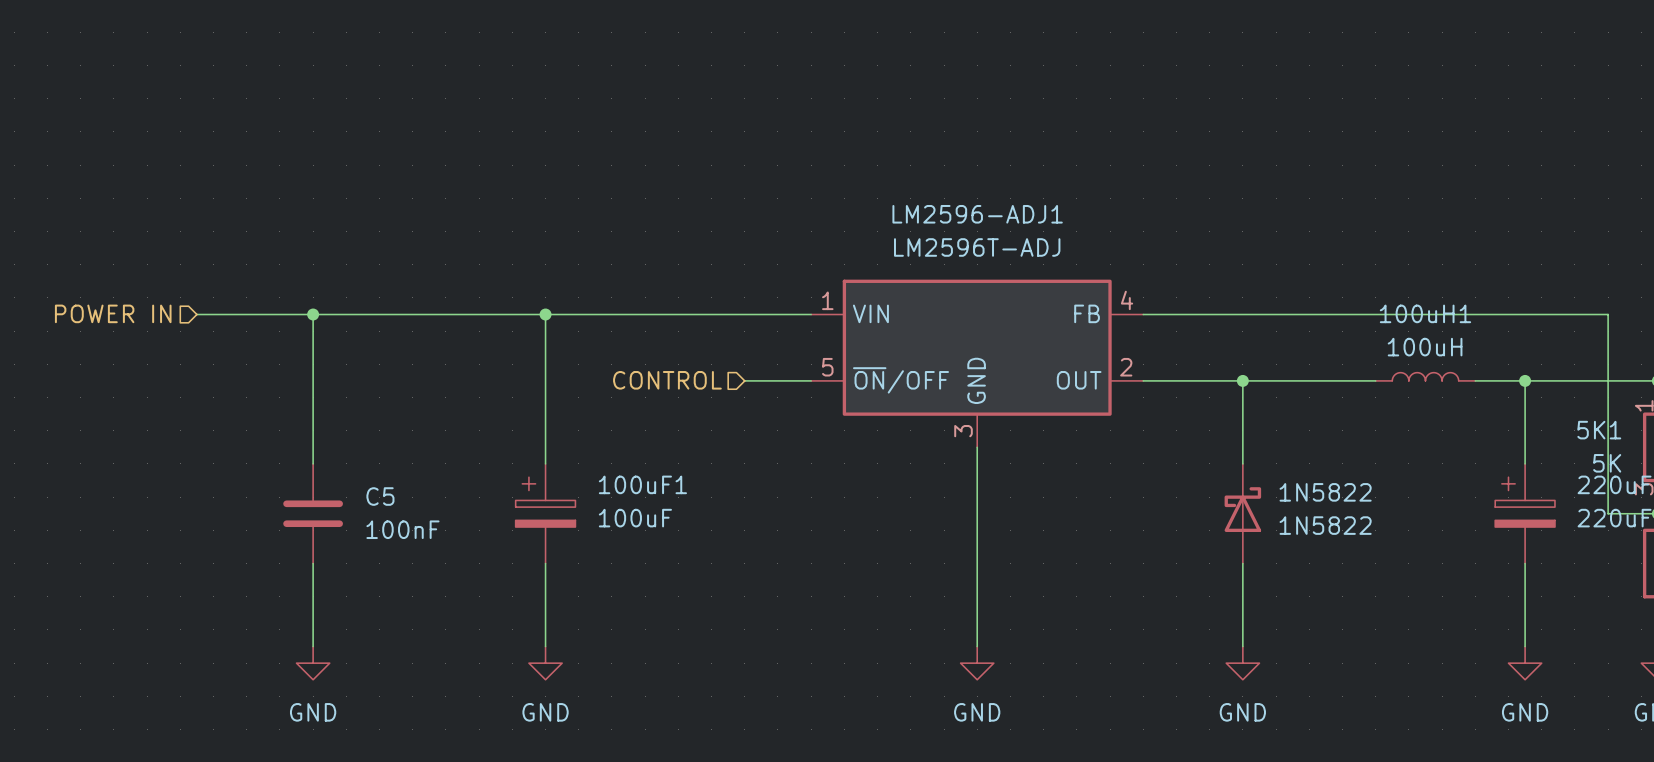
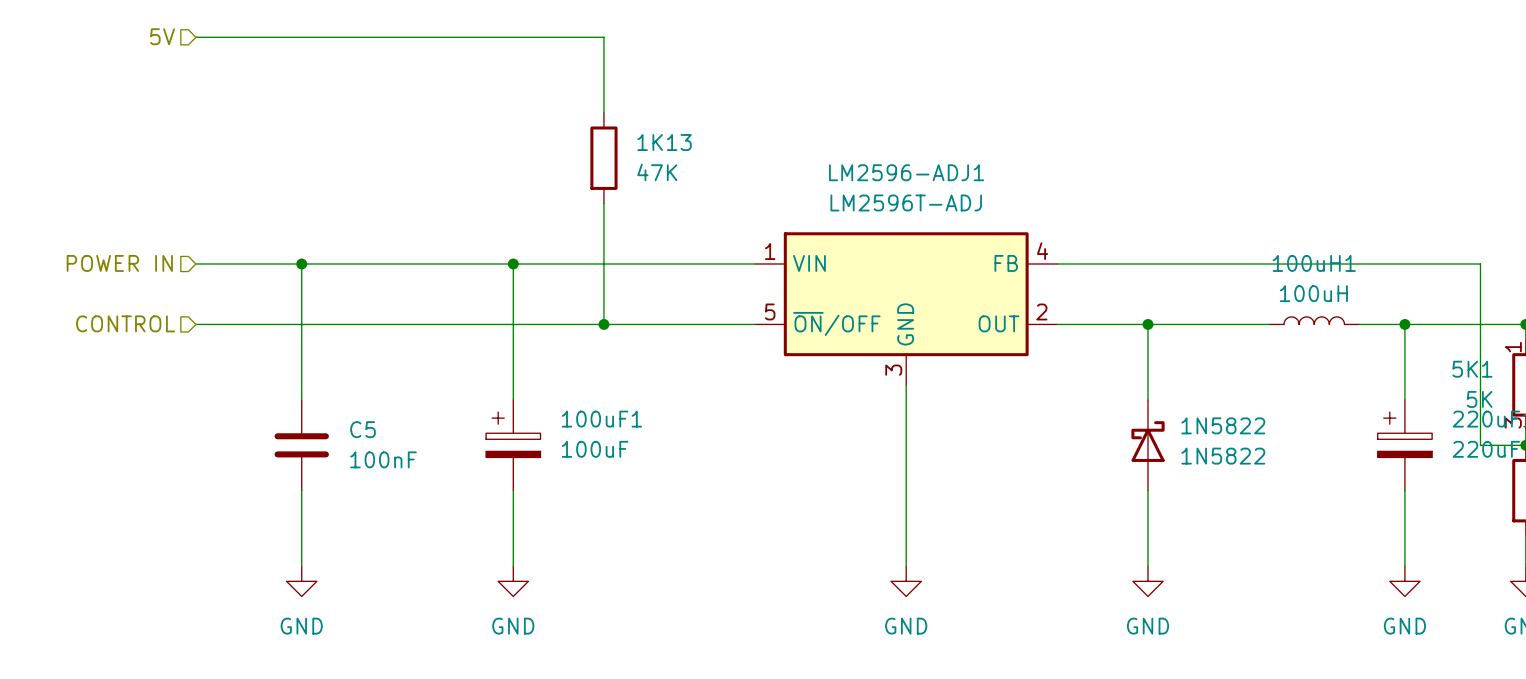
hierarchical label: none -> 5V (162, 36)
wire: none -> (195, 37) (603, 37) (603, 112)
1K13: none -> 47K (603, 158)
wire: none -> (603, 203) (603, 324)
hierarchical label: none -> CONTROL (125, 323)
wire: none -> (195, 324) (694, 324)
junction: none -> (603, 324)
hierarchical label: CONTROL (667, 380) -> none

